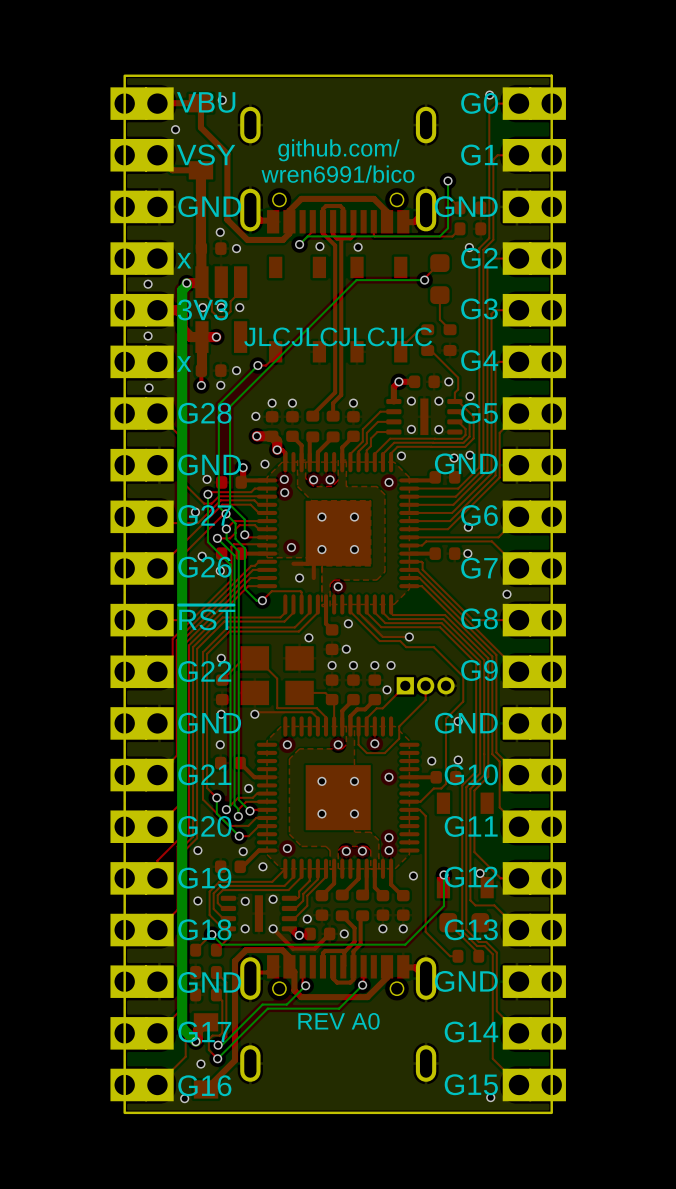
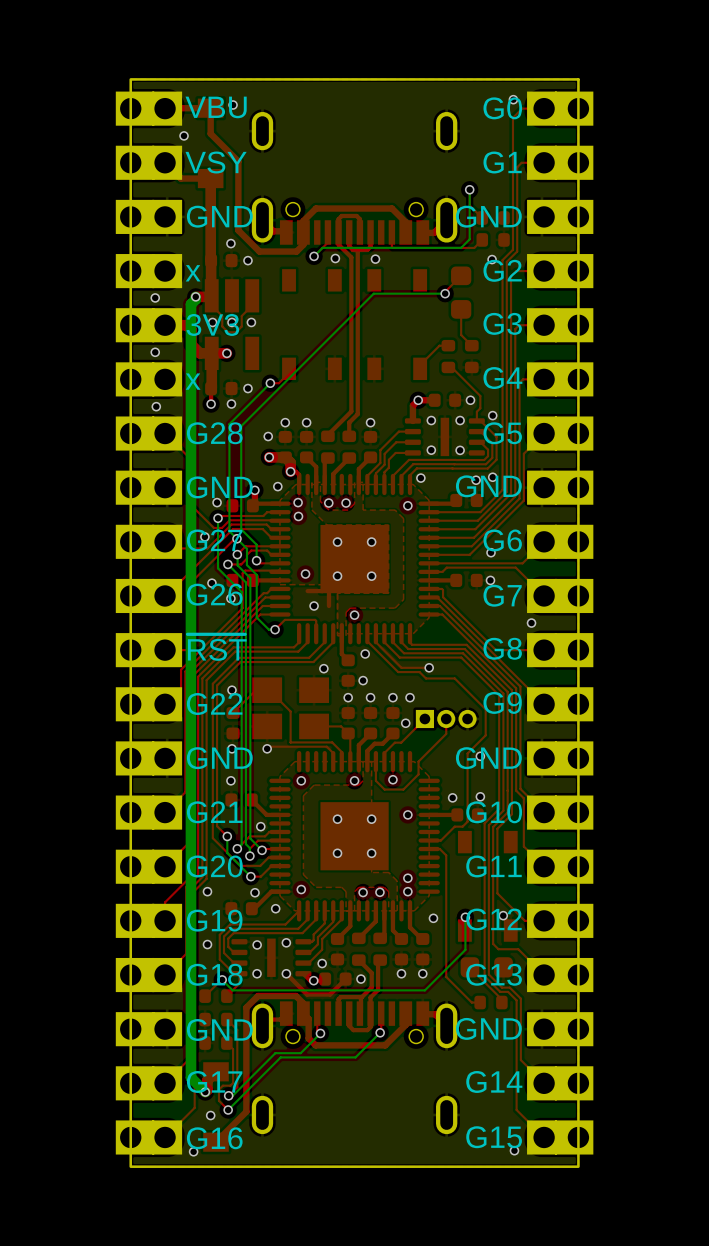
text: github.com/ (338, 150) -> none
text: wren6991/bico (337, 174) -> none
text: JLCJLCJLCJLC (338, 336) -> none
text: REV A0 (338, 1021) -> none

